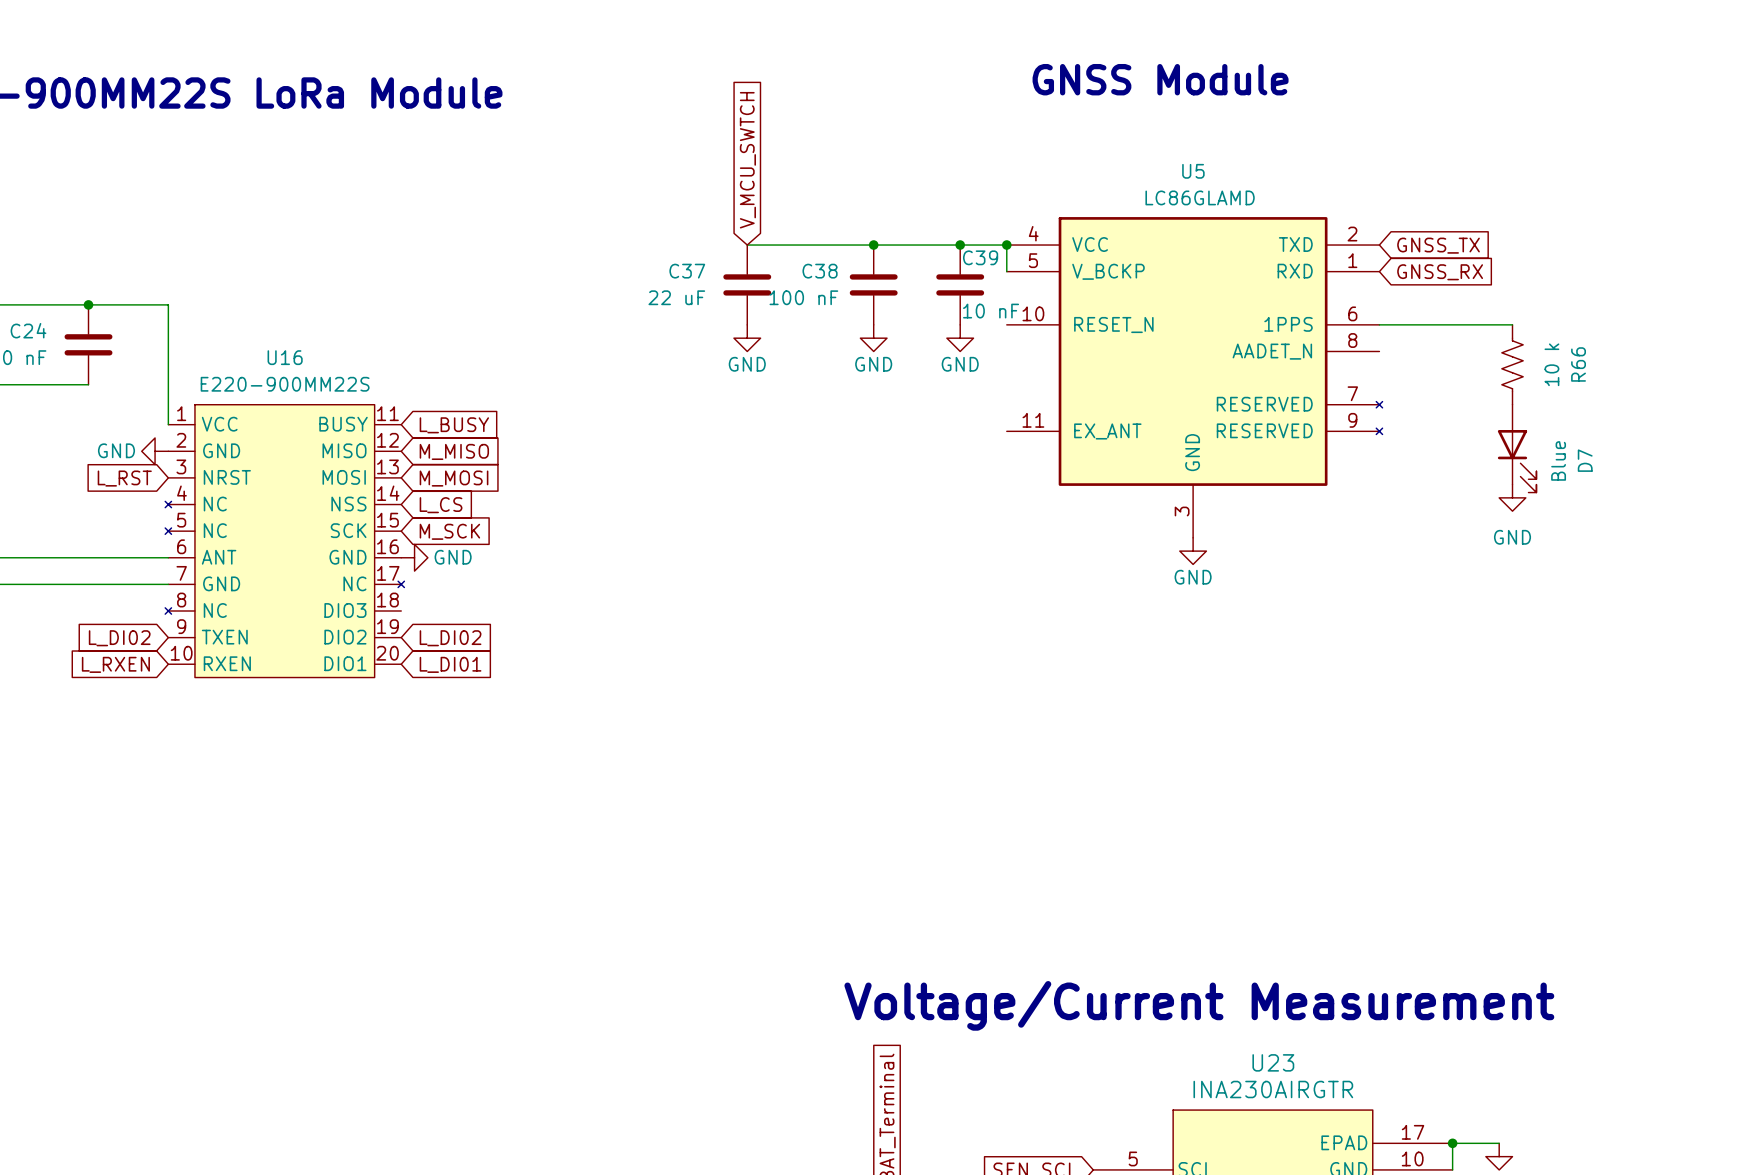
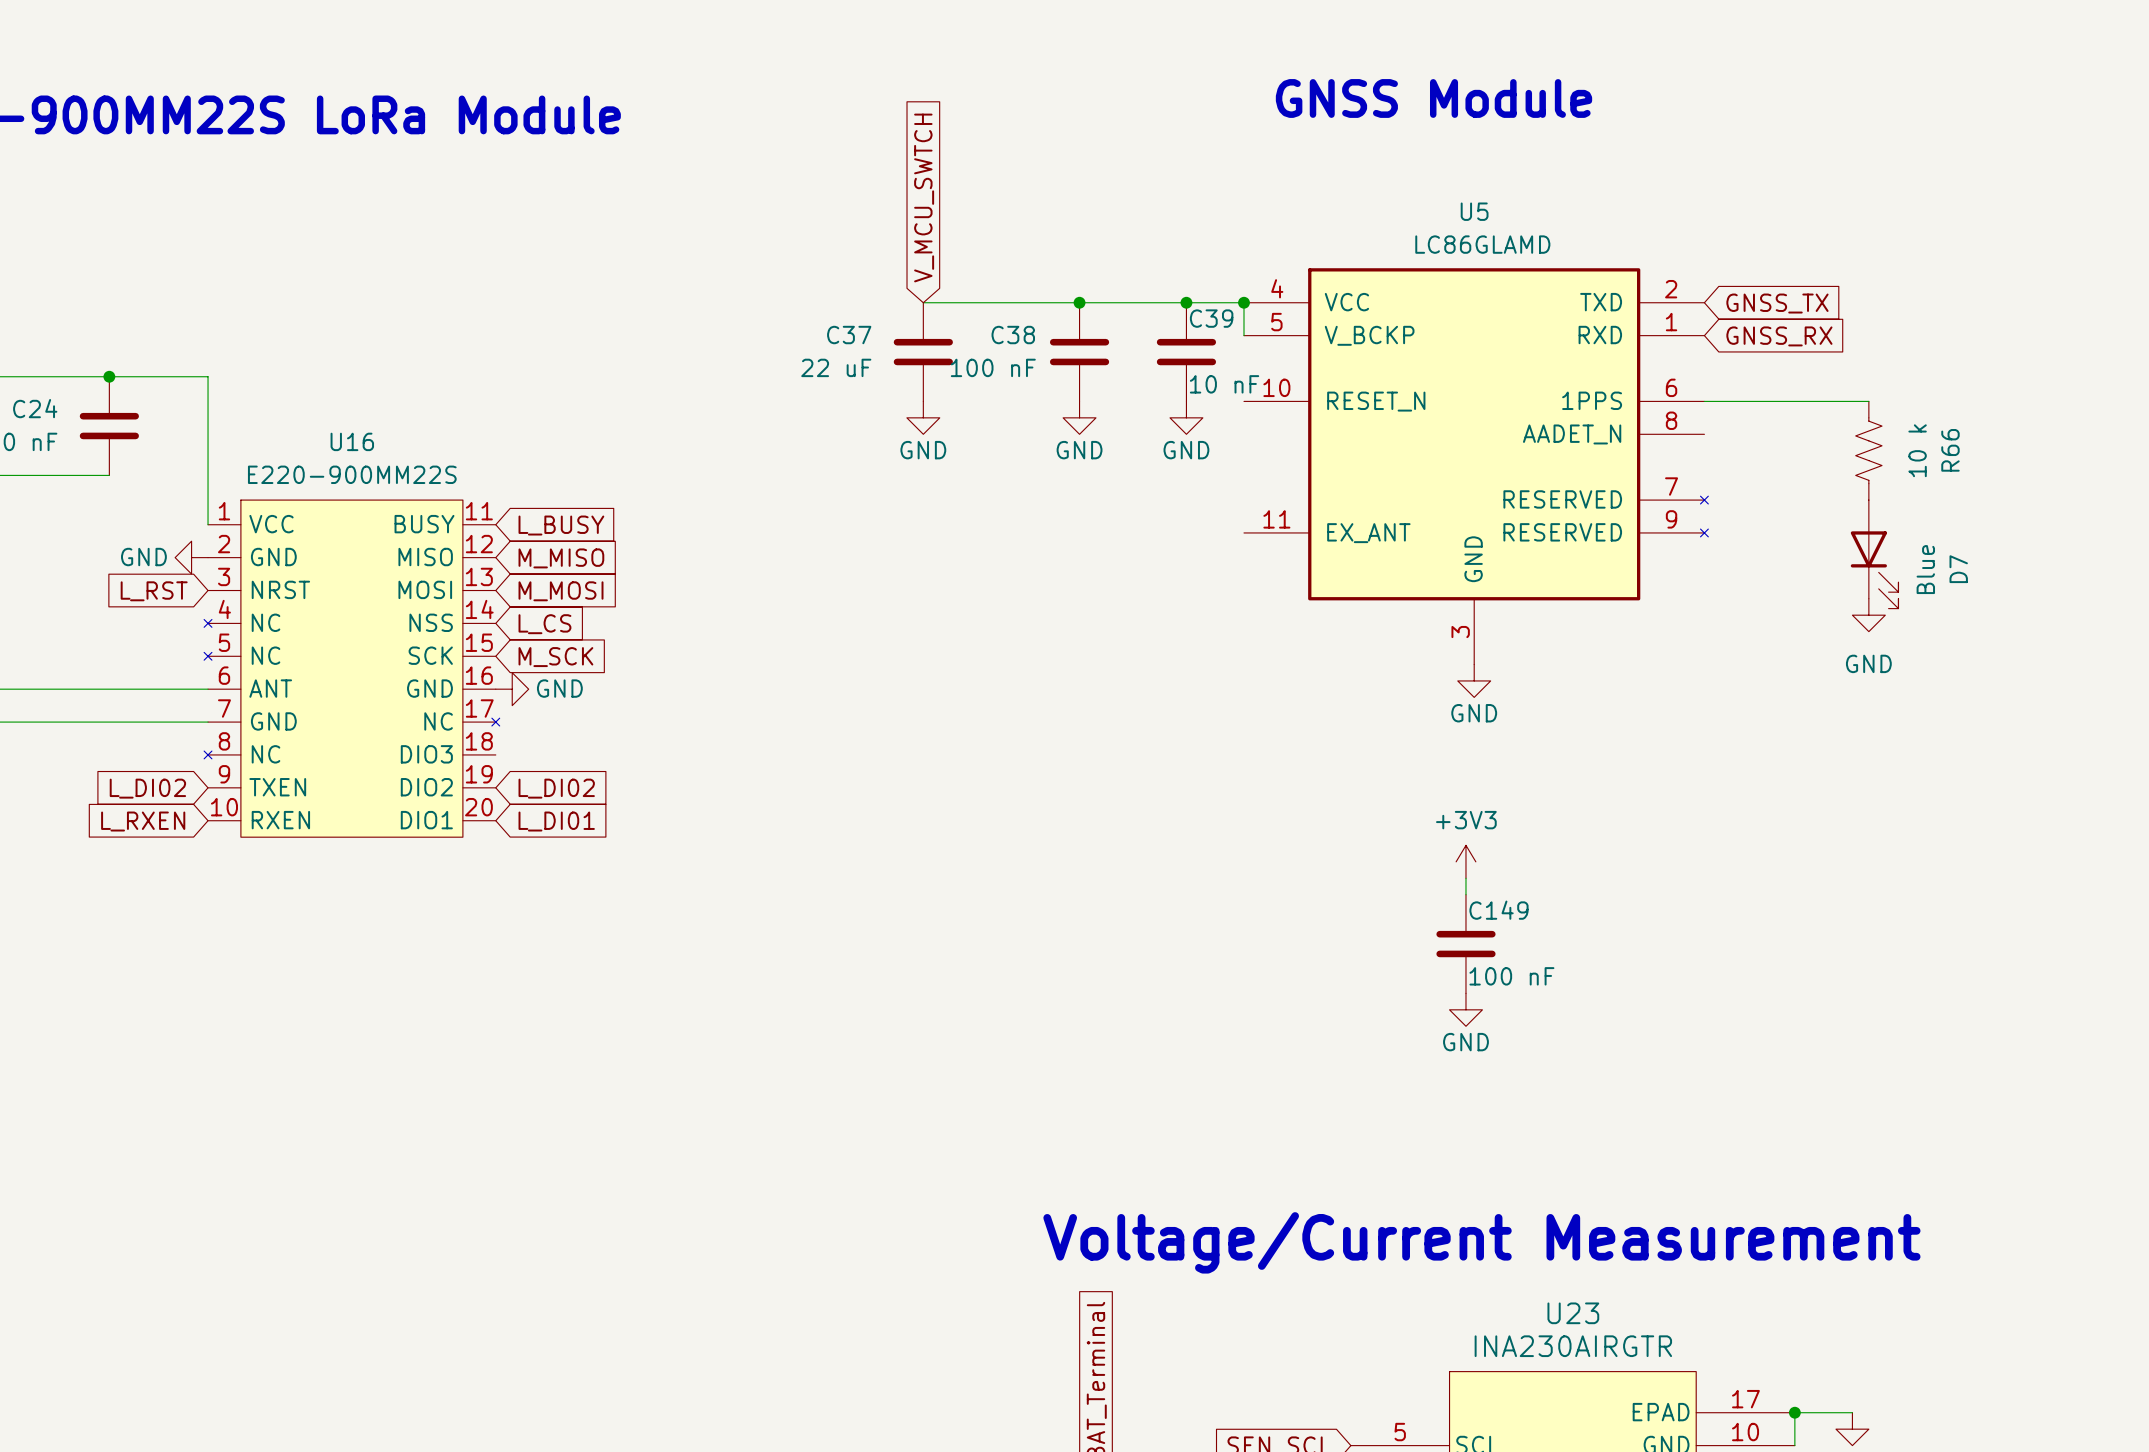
power symbol: none -> +3V3 (1465, 861)
wire: none -> (1465, 878) (1465, 894)
C149: none -> 100 nF (1465, 944)
power symbol: none -> GND (1465, 1009)

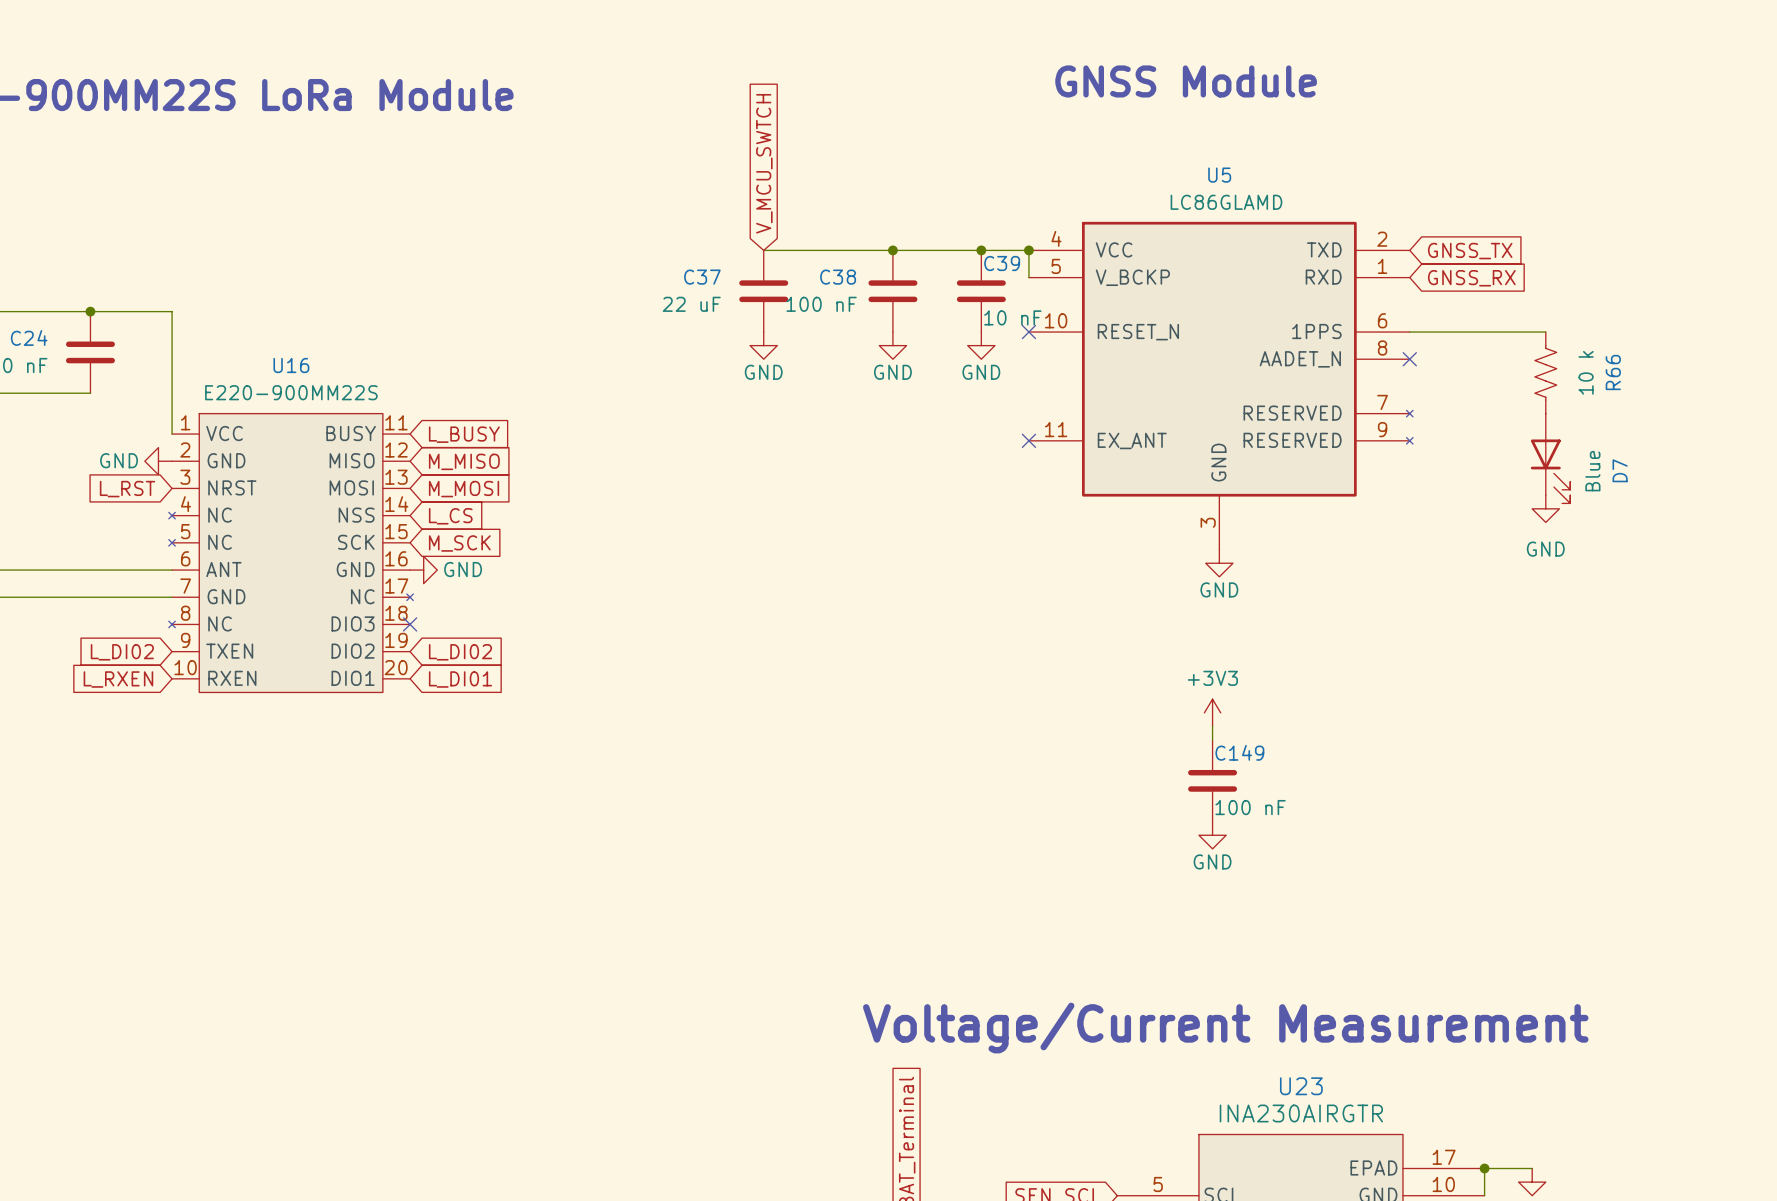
no-connect mark: none -> (1028, 332)
no-connect mark: none -> (1409, 359)
no-connect mark: none -> (1028, 440)
no-connect mark: none -> (410, 624)

